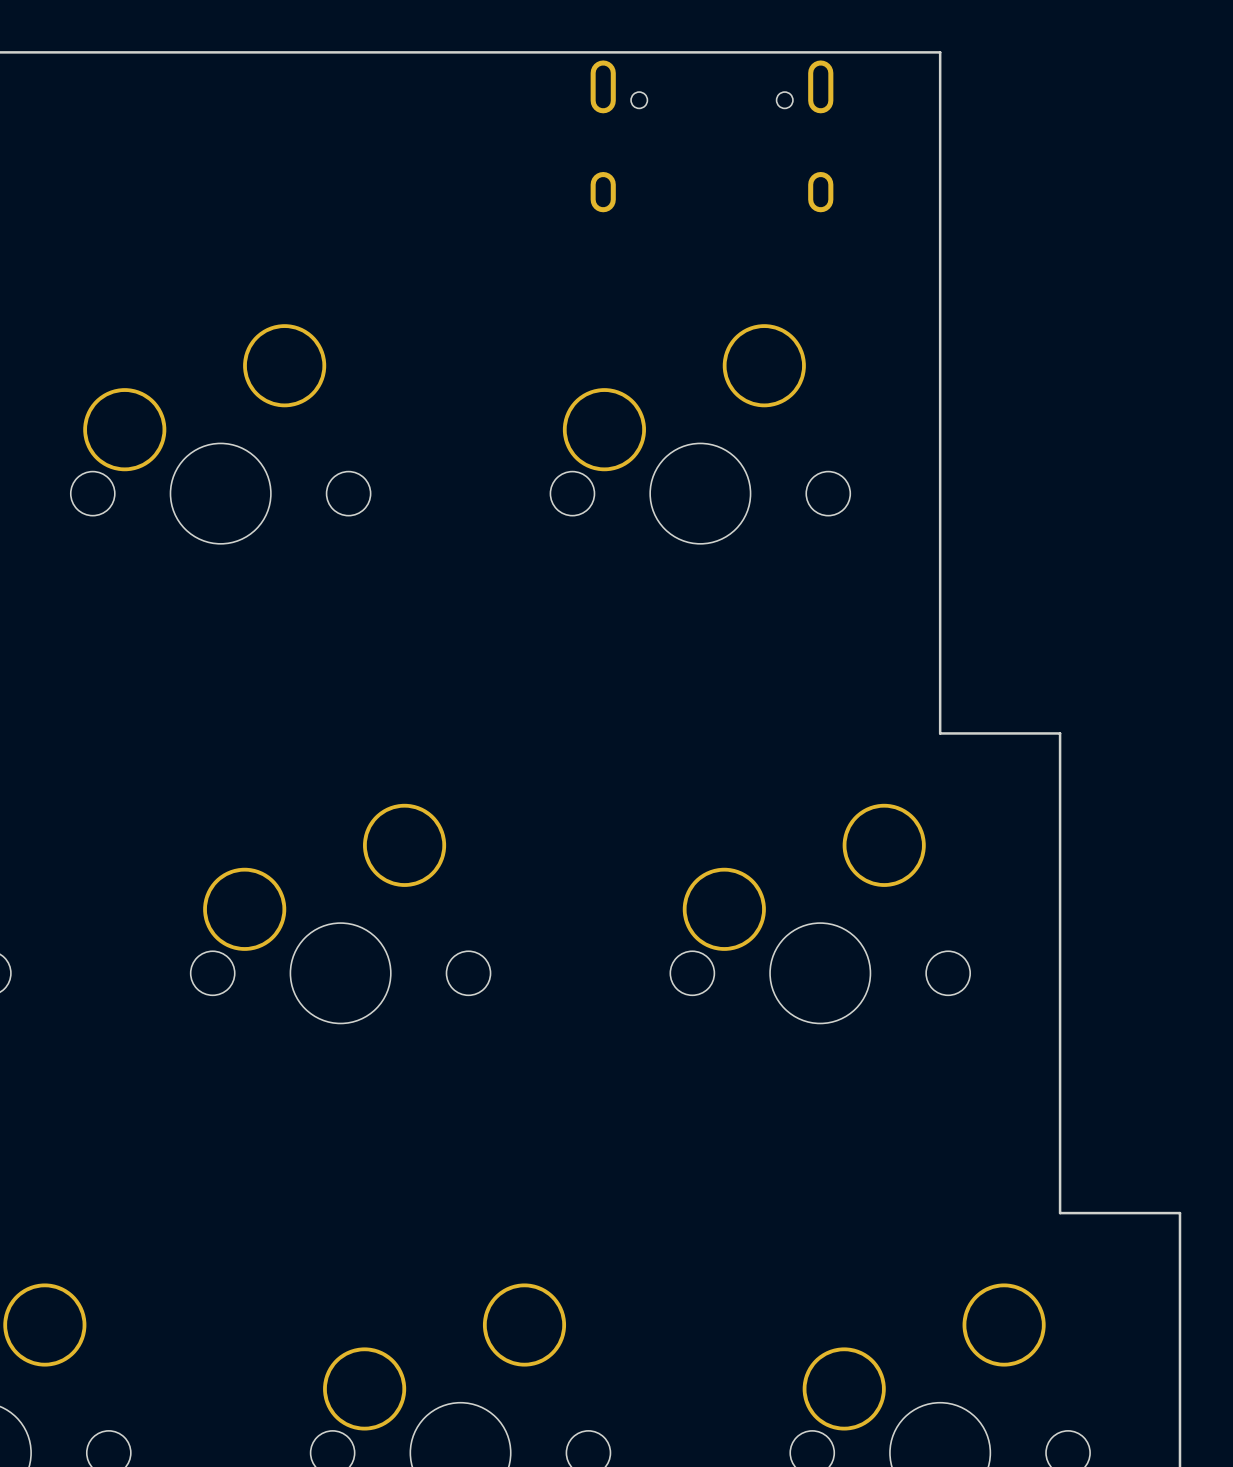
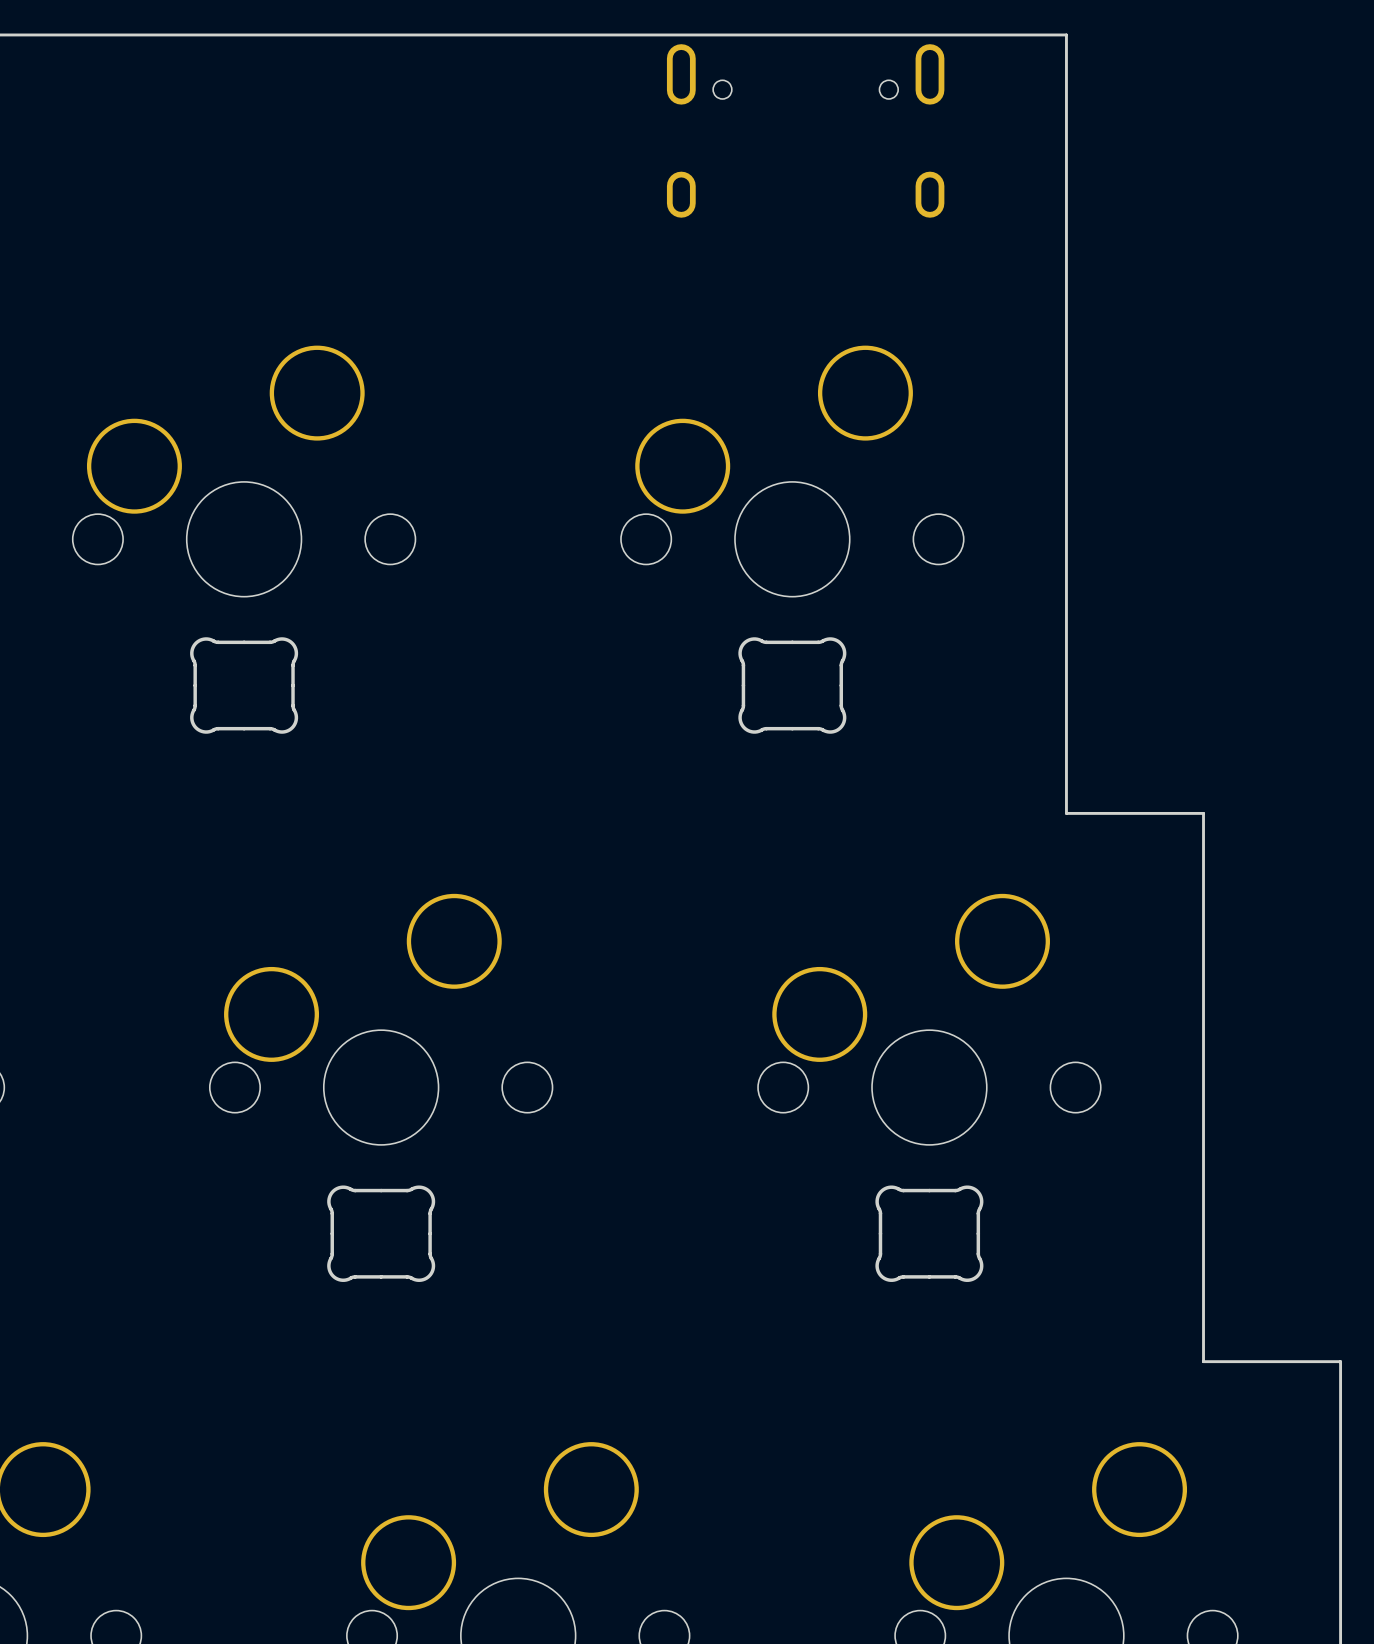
part: none -> (244, 685)
part: none -> (792, 685)
part: none -> (381, 1233)
part: none -> (929, 1233)

